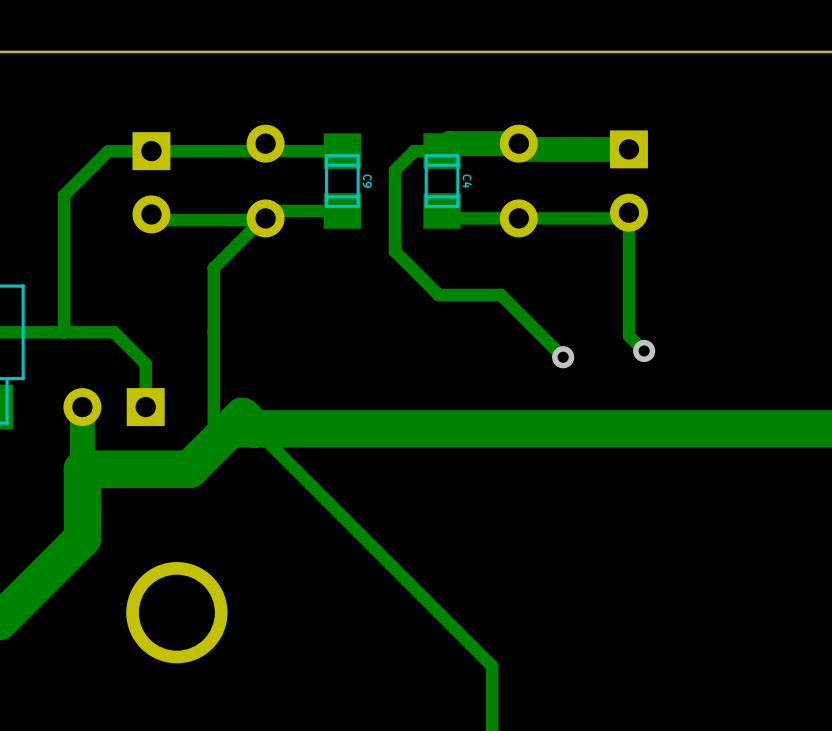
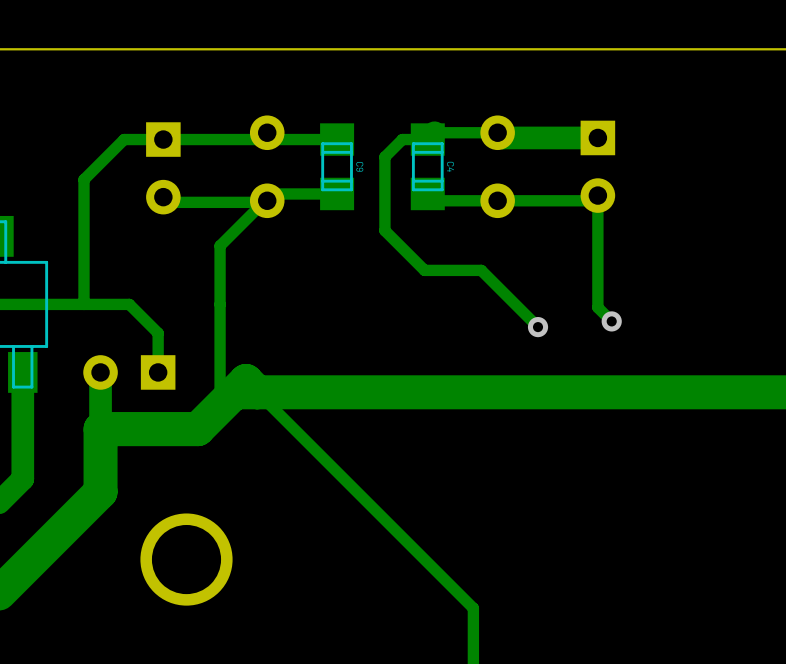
track width: thick (518, 143) (449, 143) -> thin (497, 132) (434, 132)

